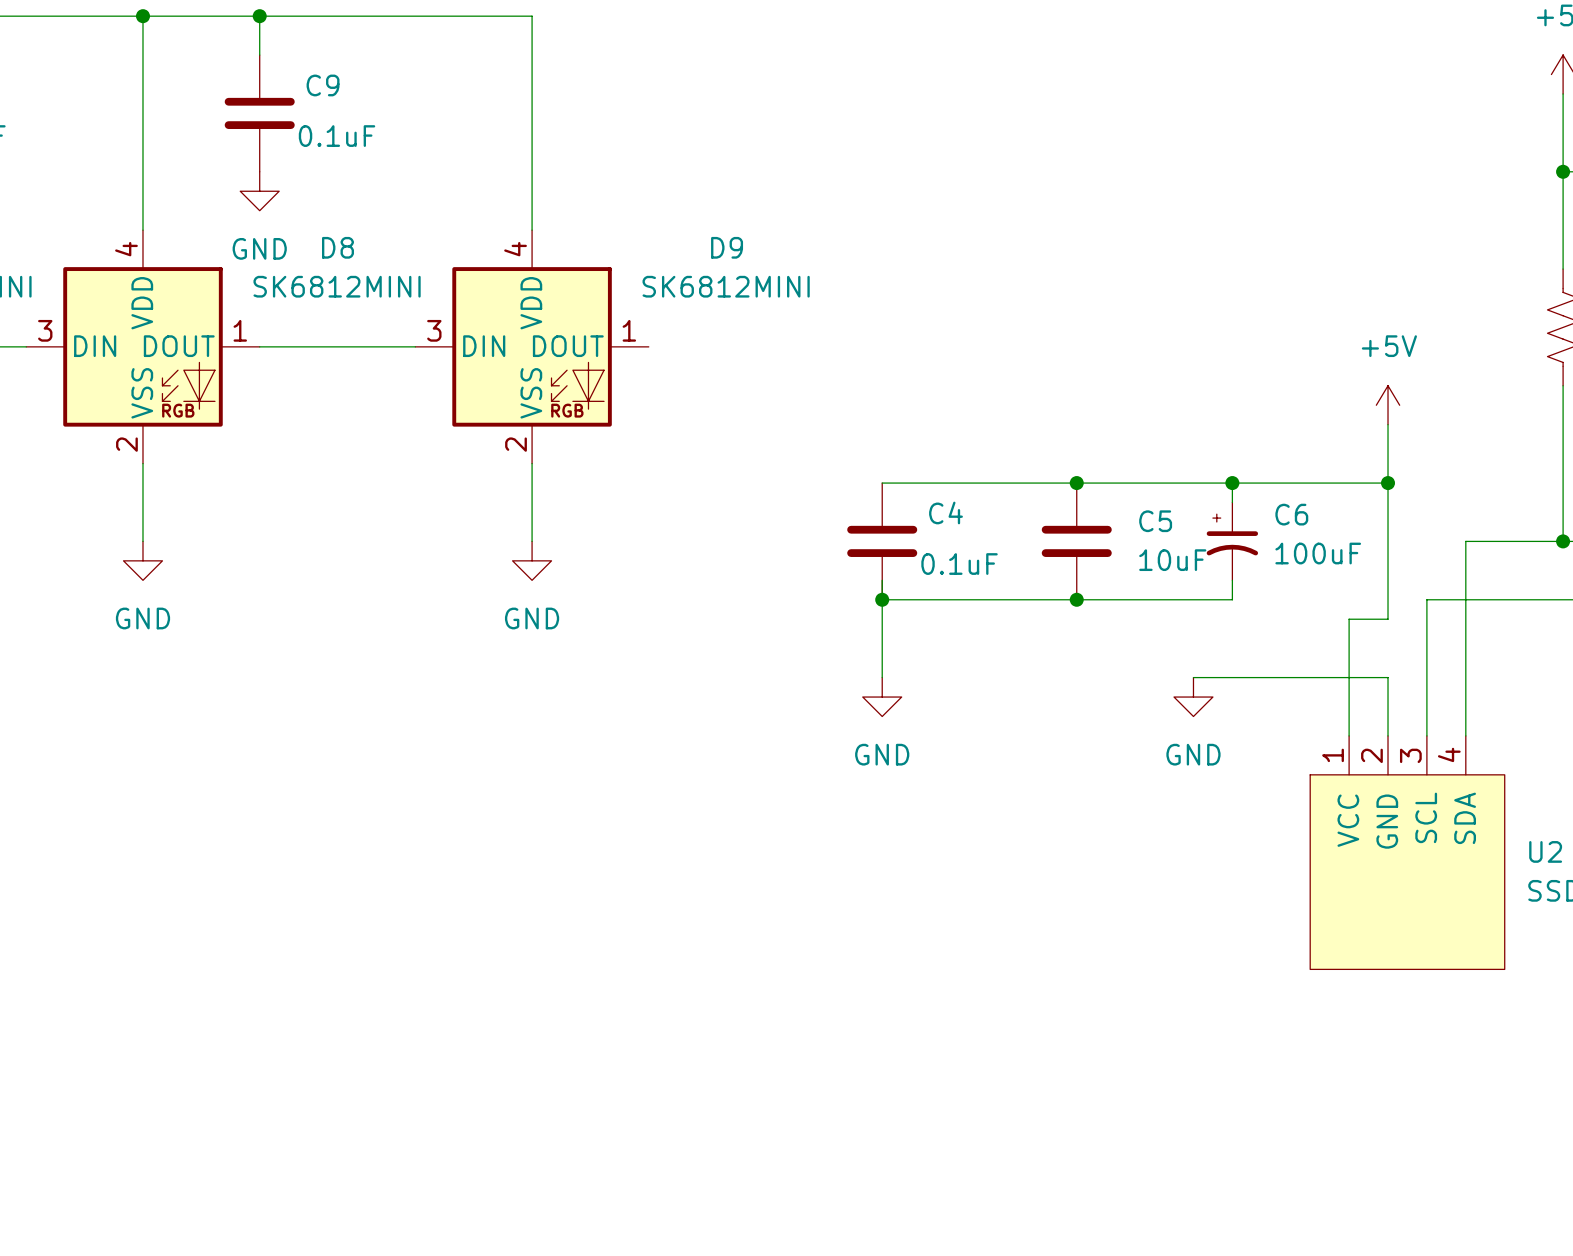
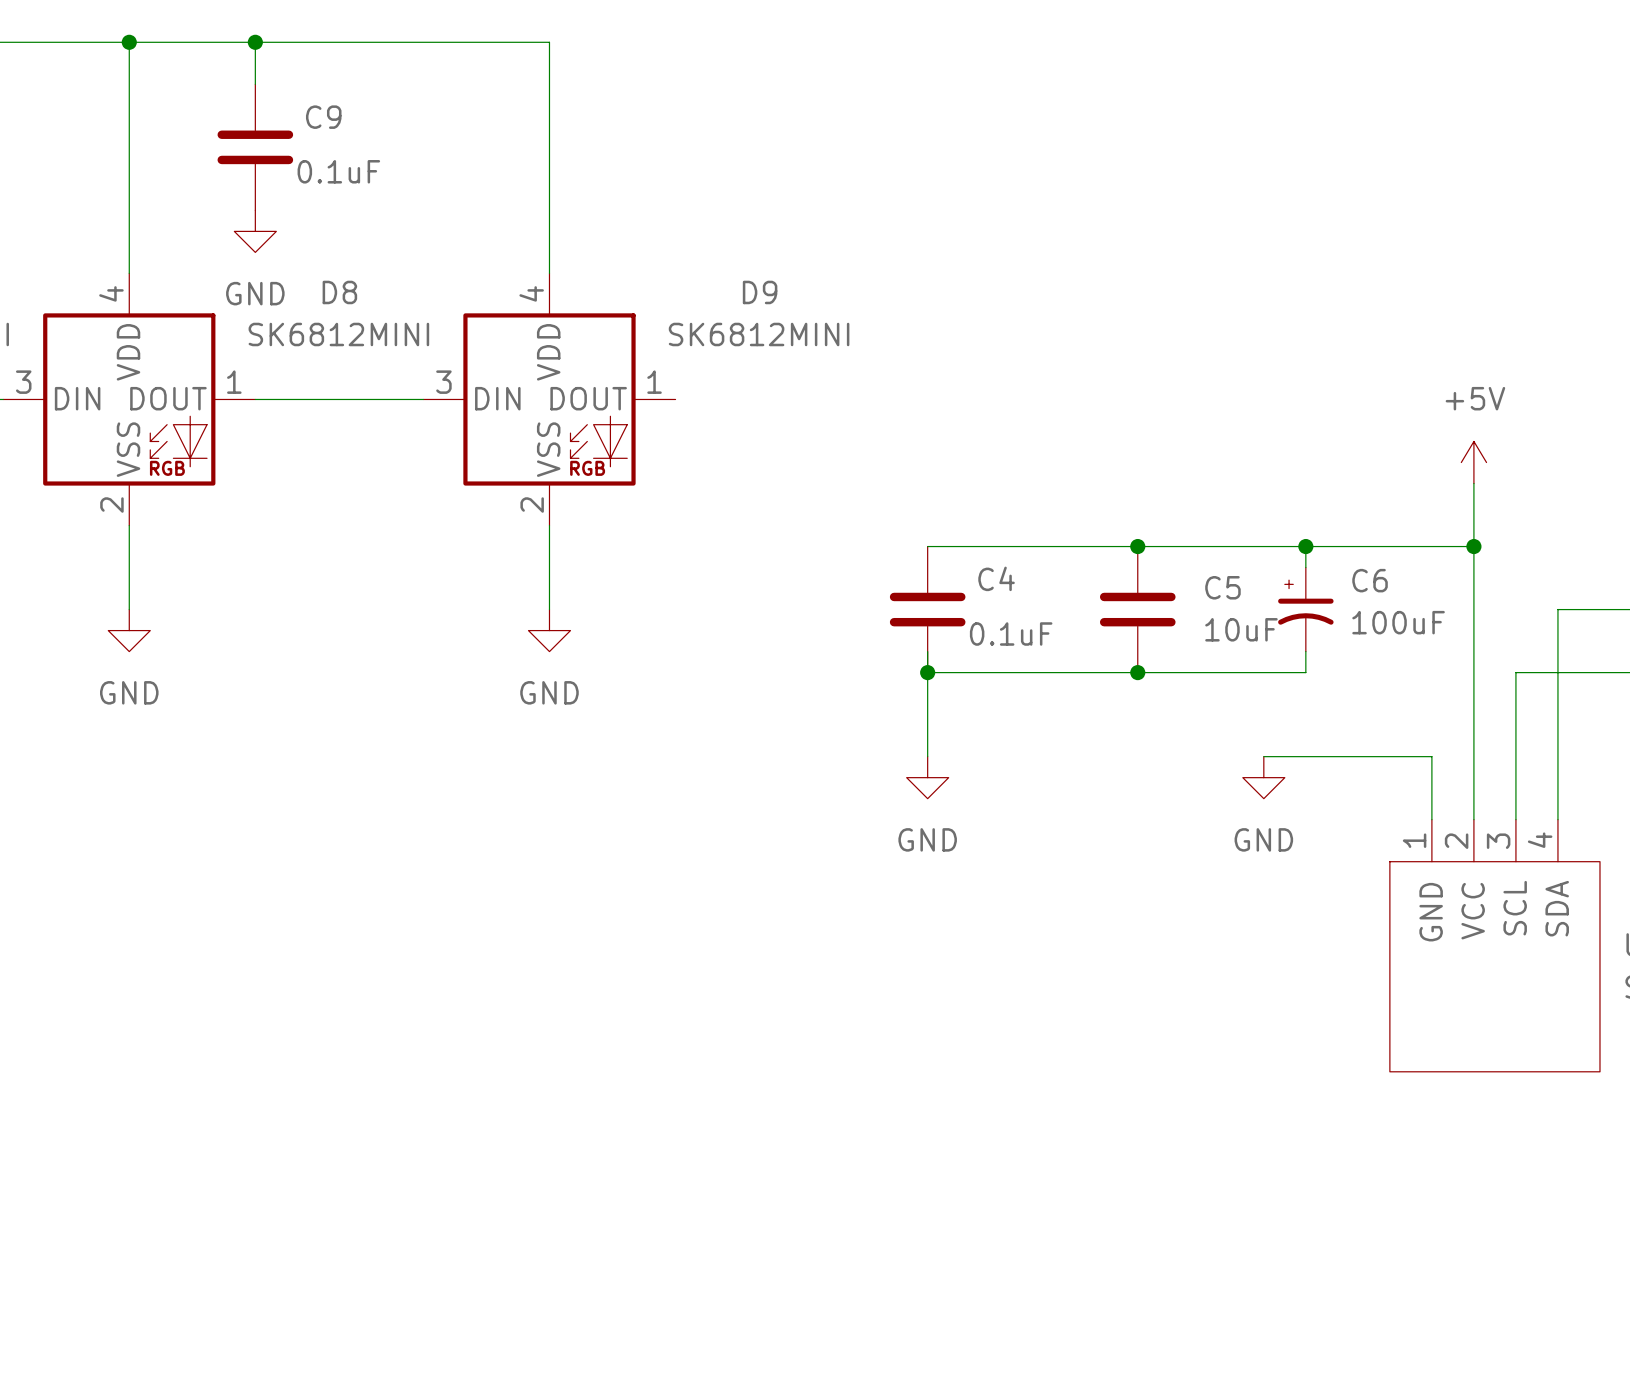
wire: (1388, 619) (1349, 619) (1349, 677) (1388, 677) -> (1473, 693) (1473, 756)
U2 pin name: VCC (1348, 820) -> GND (1431, 912)
U2 pin name: GND (1387, 821) -> VCC (1473, 911)

